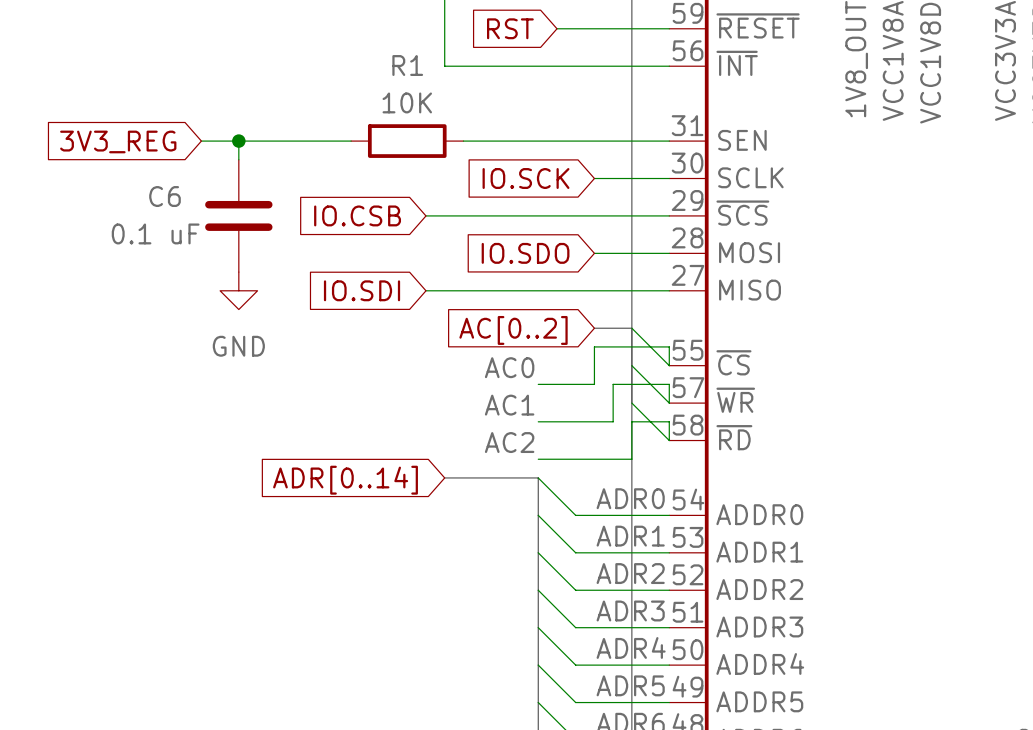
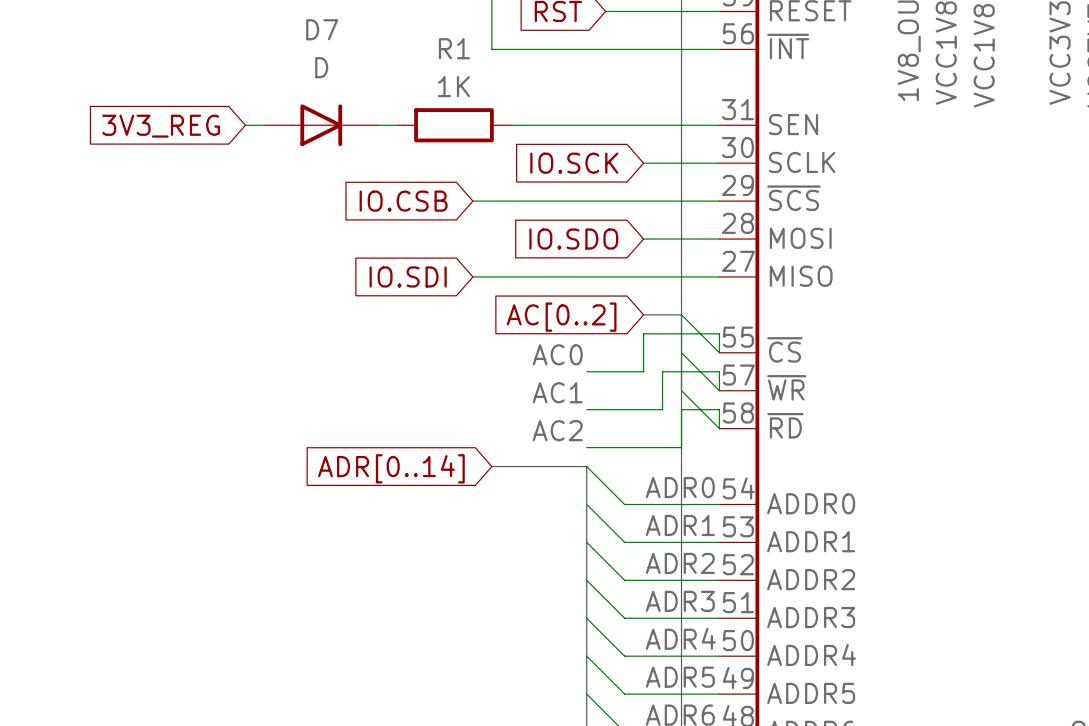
R1 value: 10K (407, 102) -> 1K (453, 86)
wire: (238, 141) (238, 159) -> none
junction: (238, 141) -> none
D7: none -> D (321, 125)
C6: 0.1 uF (238, 215) -> none
power symbol: GND (238, 290) -> none

